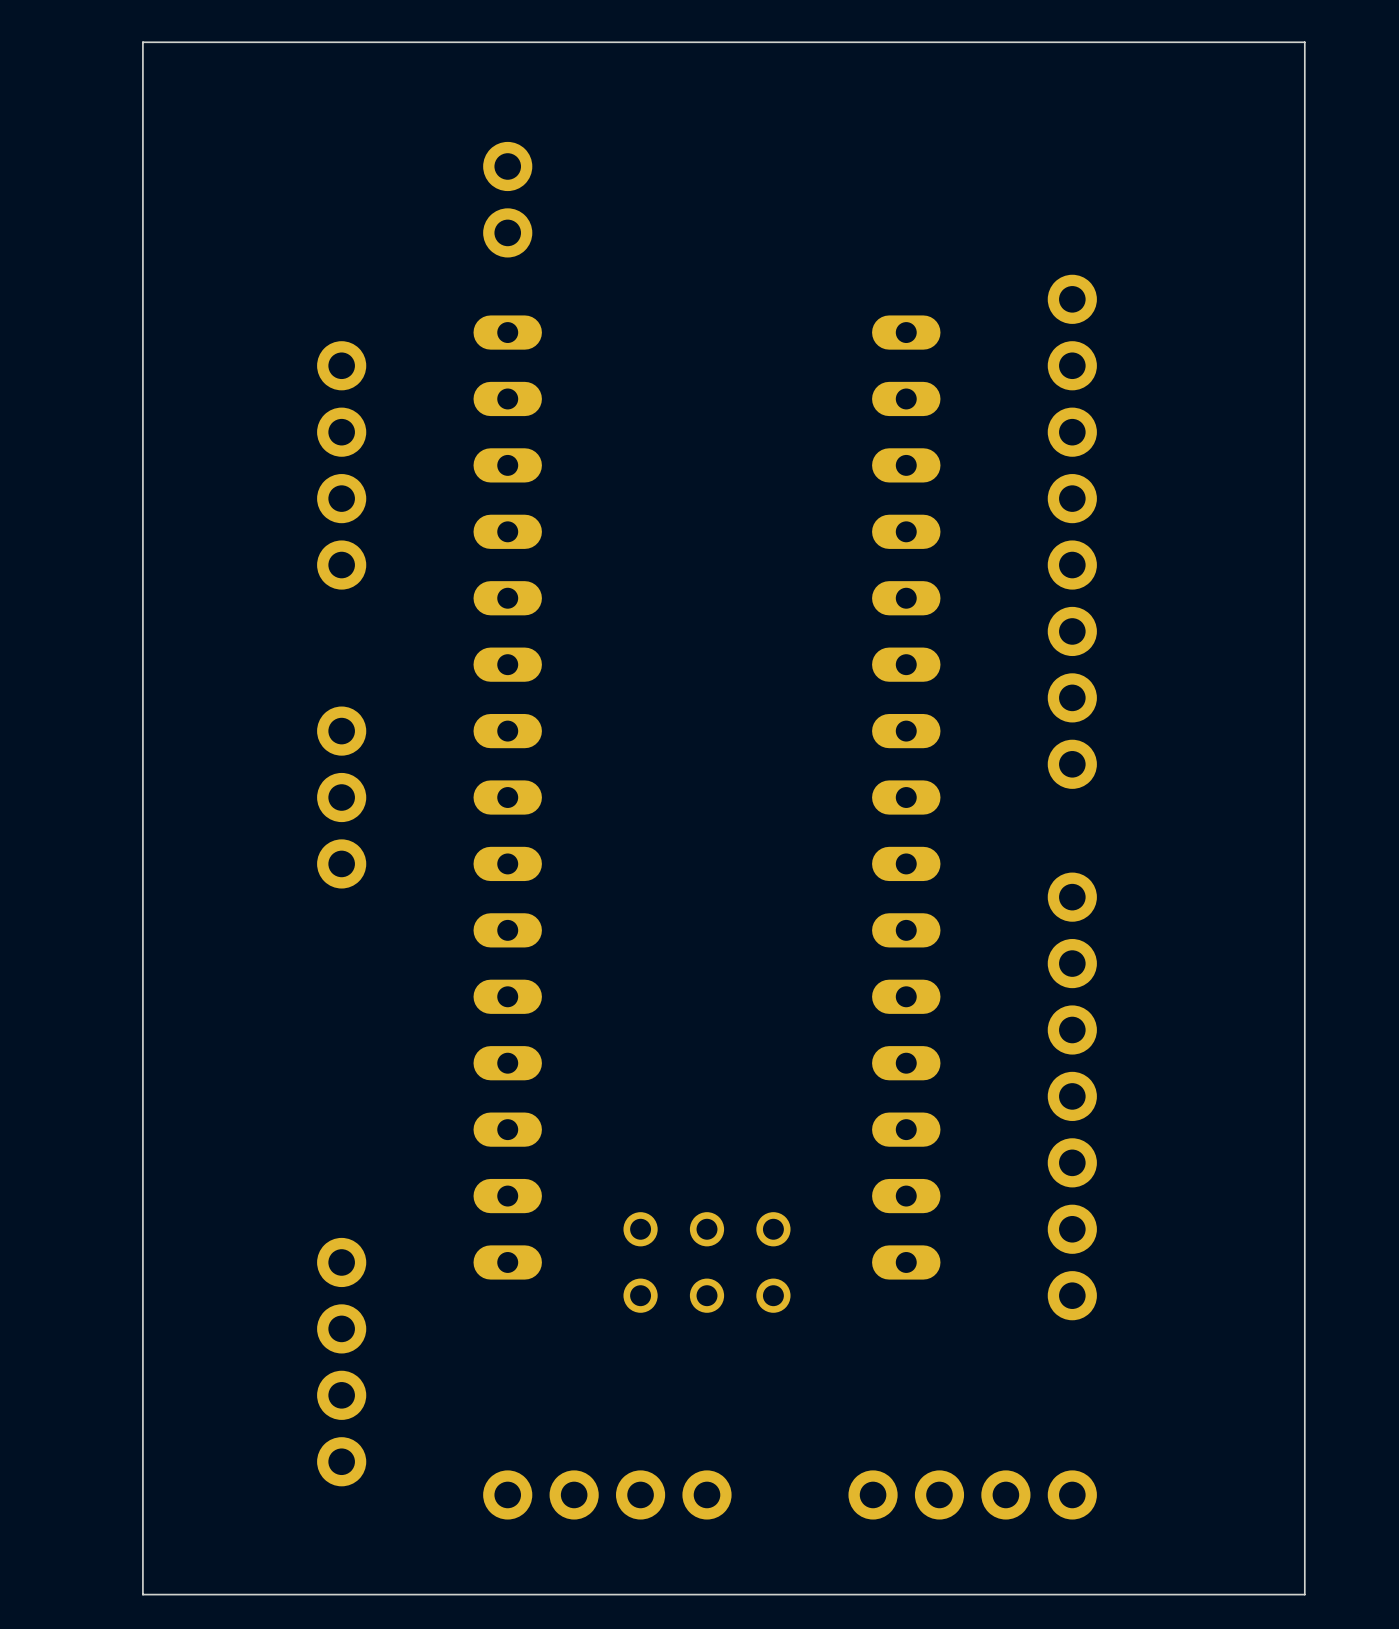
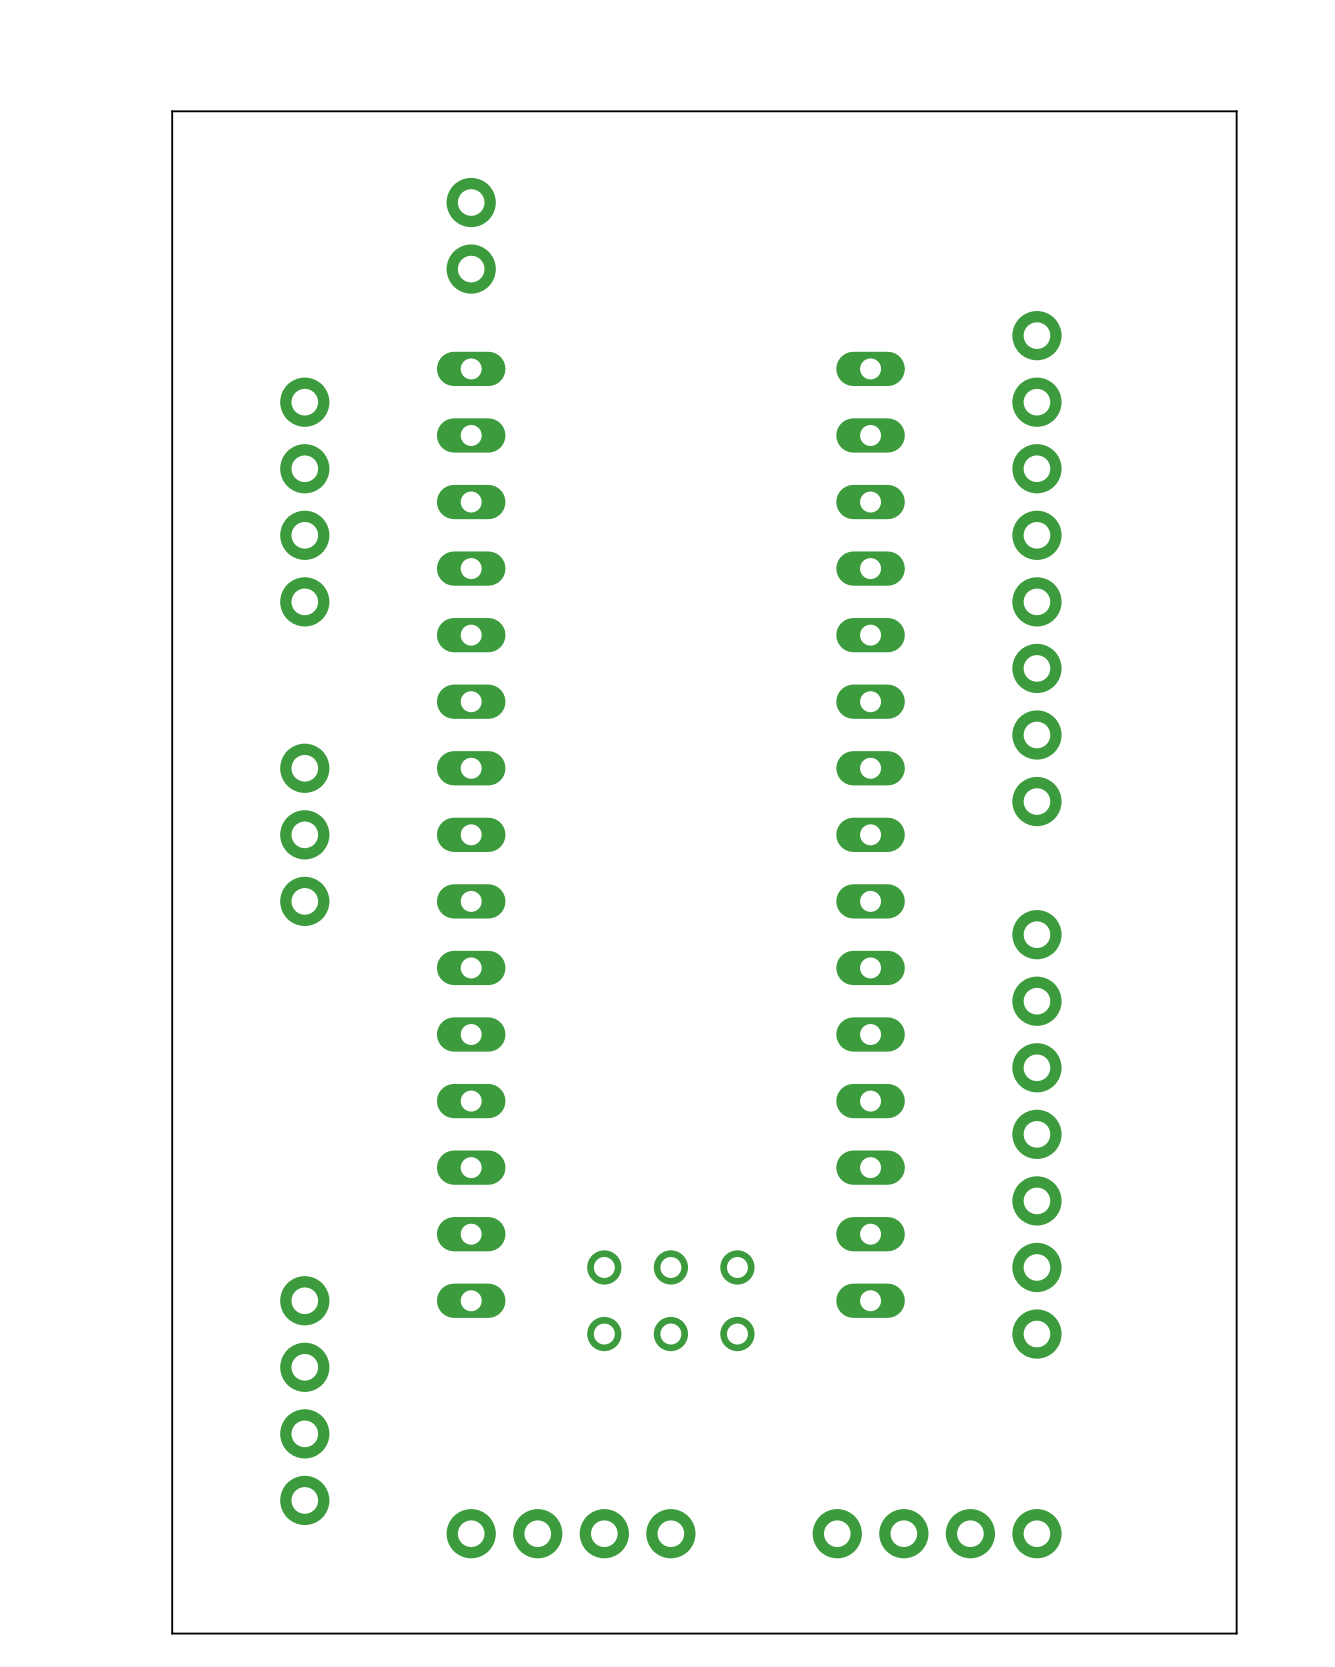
board edge: (1271, 1594) (1304, 1594) (1304, 42) (142, 42) (142, 1594) (209, 1594) -> (1236, 1633) (1236, 111) (172, 111) (172, 1633)

